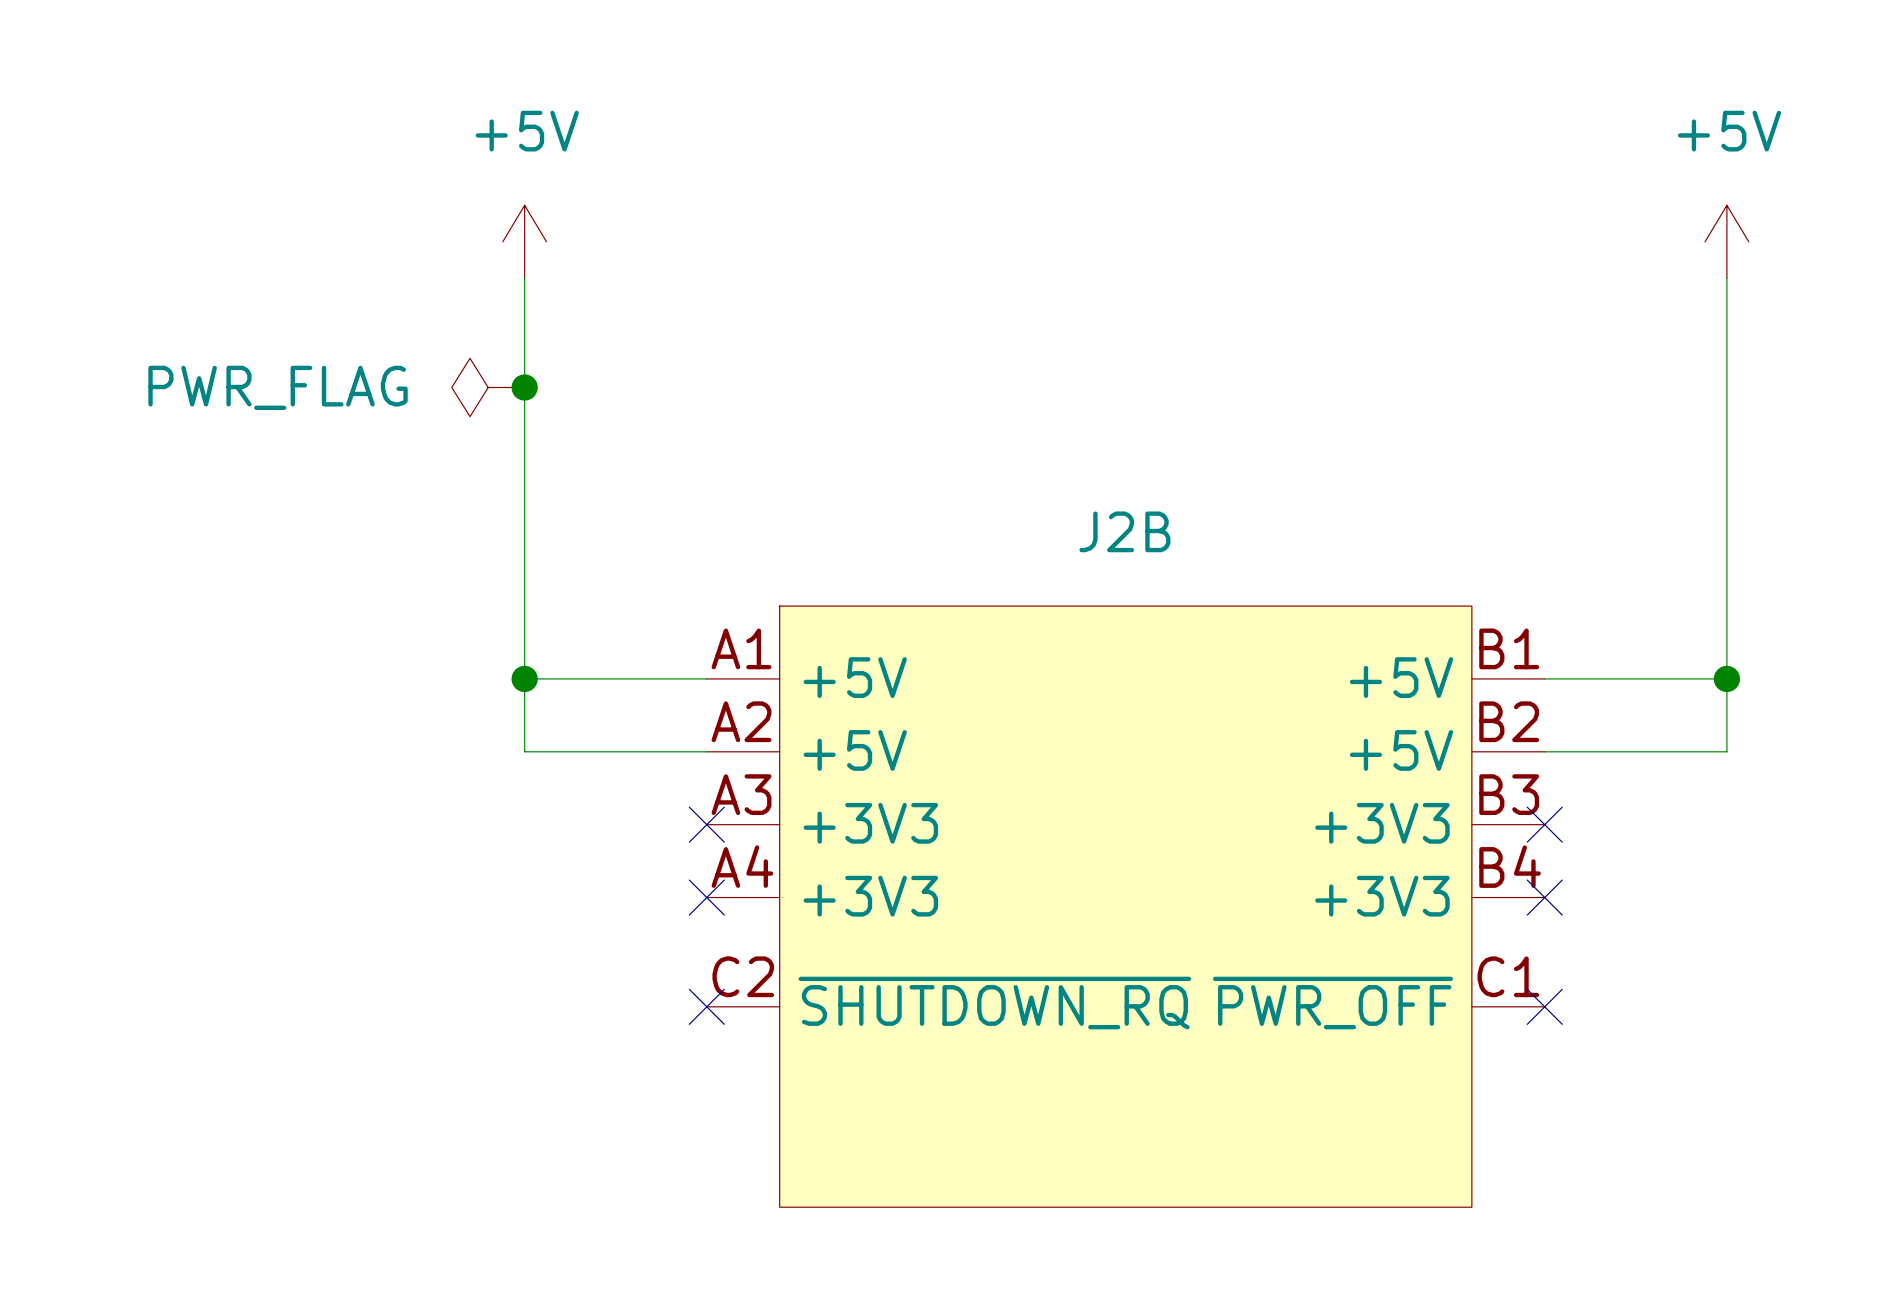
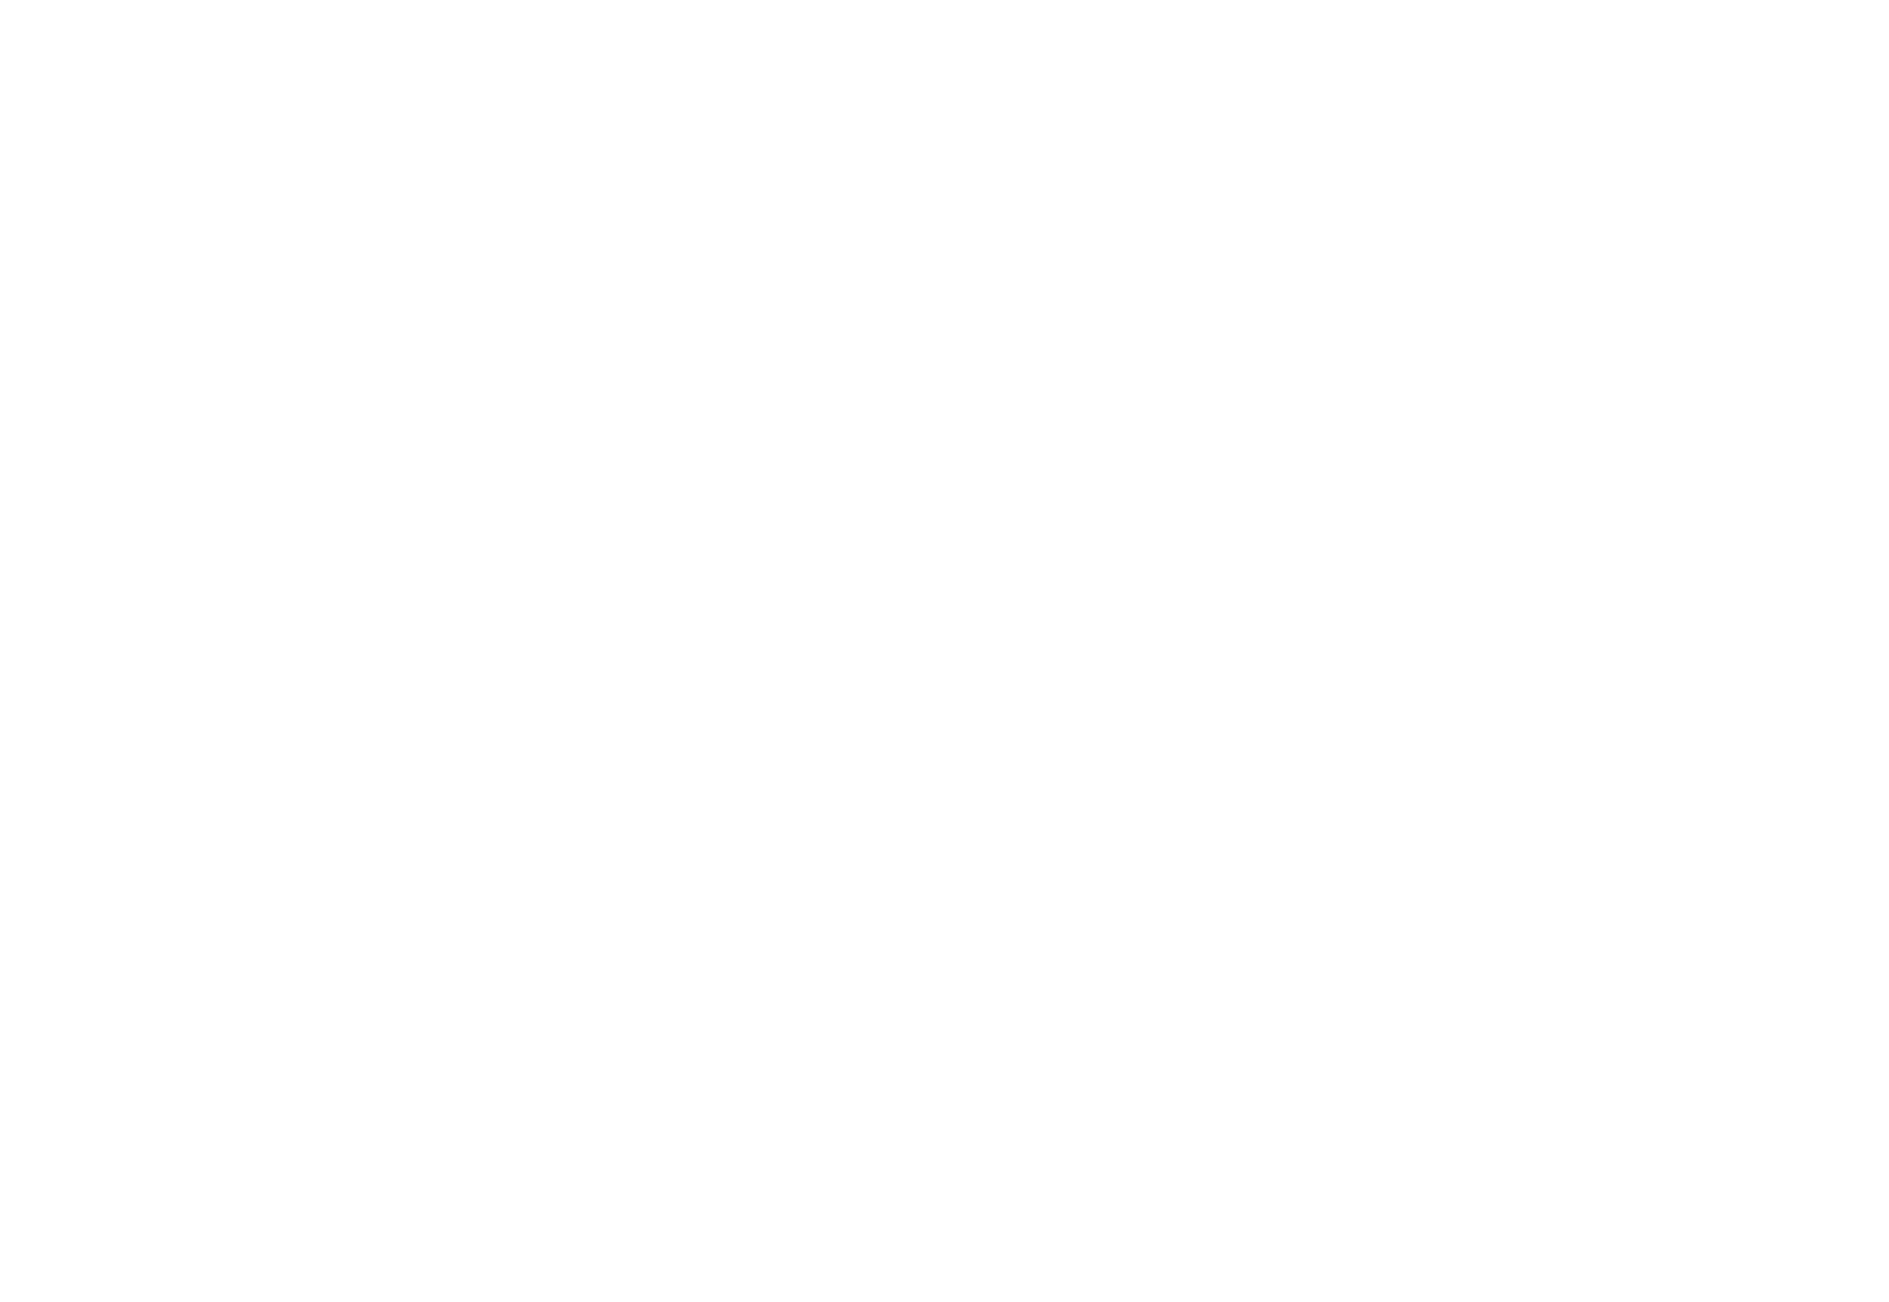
power symbol: +5V (524, 241) -> none
power symbol: +5V (1726, 241) -> none
wire: (524, 278) (524, 751) (706, 751) -> none
wire: (1726, 278) (1726, 751) (1544, 751) -> none
power symbol: PWR_FLAG (488, 387) -> none
junction: (524, 387) -> none
wire: (524, 678) (706, 678) -> none
junction: (524, 678) -> none
wire: (1544, 678) (1726, 678) -> none
junction: (1726, 678) -> none
no-connect mark: (706, 824) -> none
no-connect mark: (1544, 824) -> none
no-connect mark: (706, 897) -> none
no-connect mark: (1544, 897) -> none
J2B: (1125, 906) -> none
no-connect mark: (706, 1006) -> none
no-connect mark: (1544, 1006) -> none

